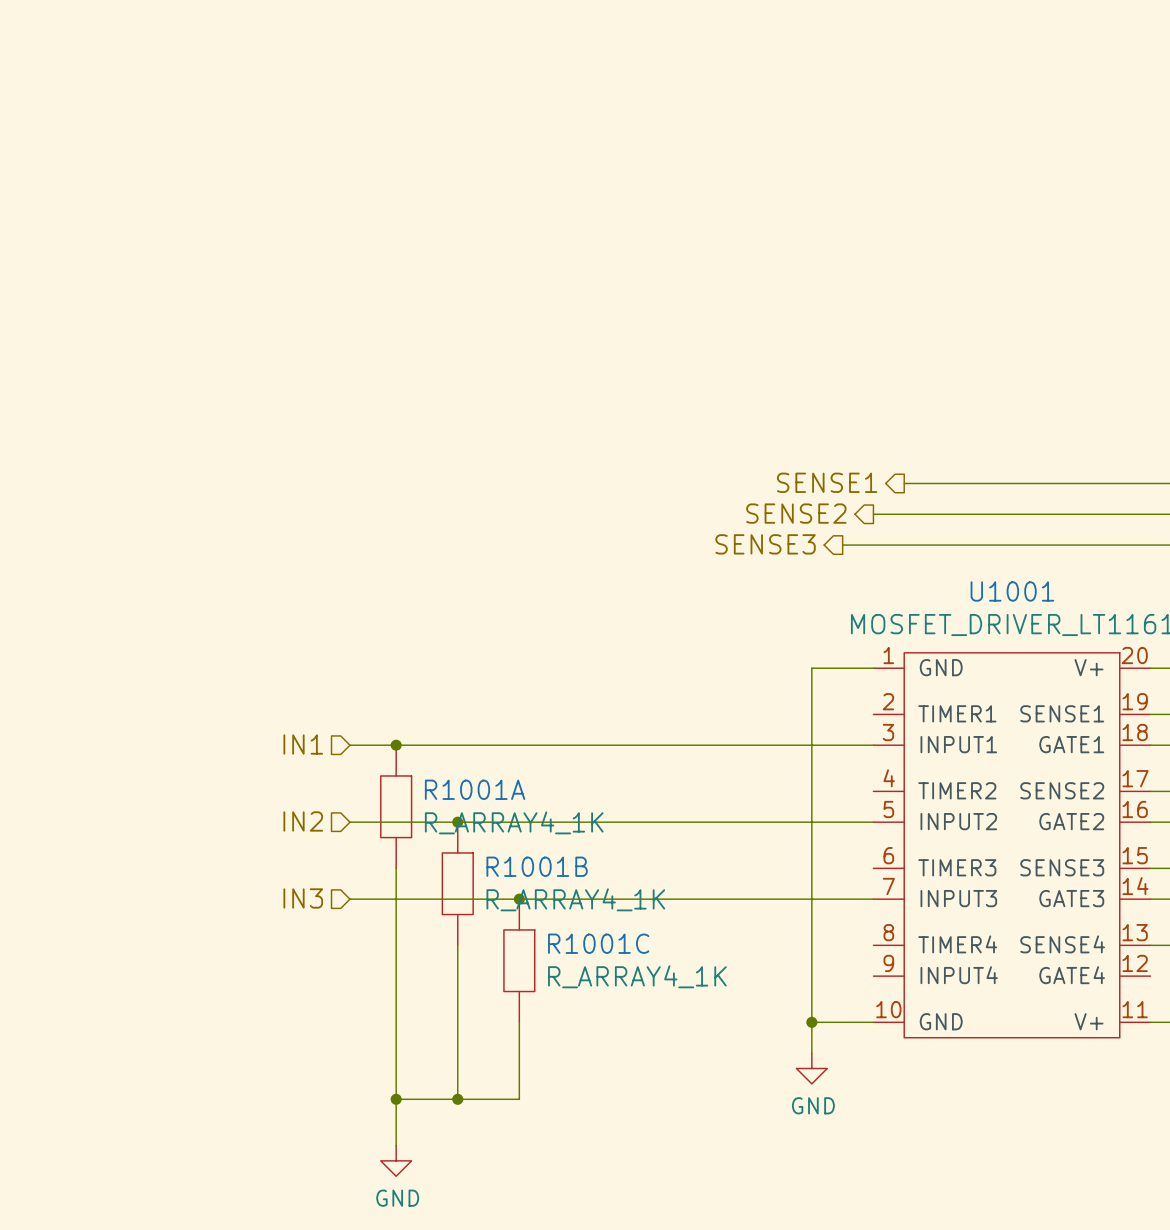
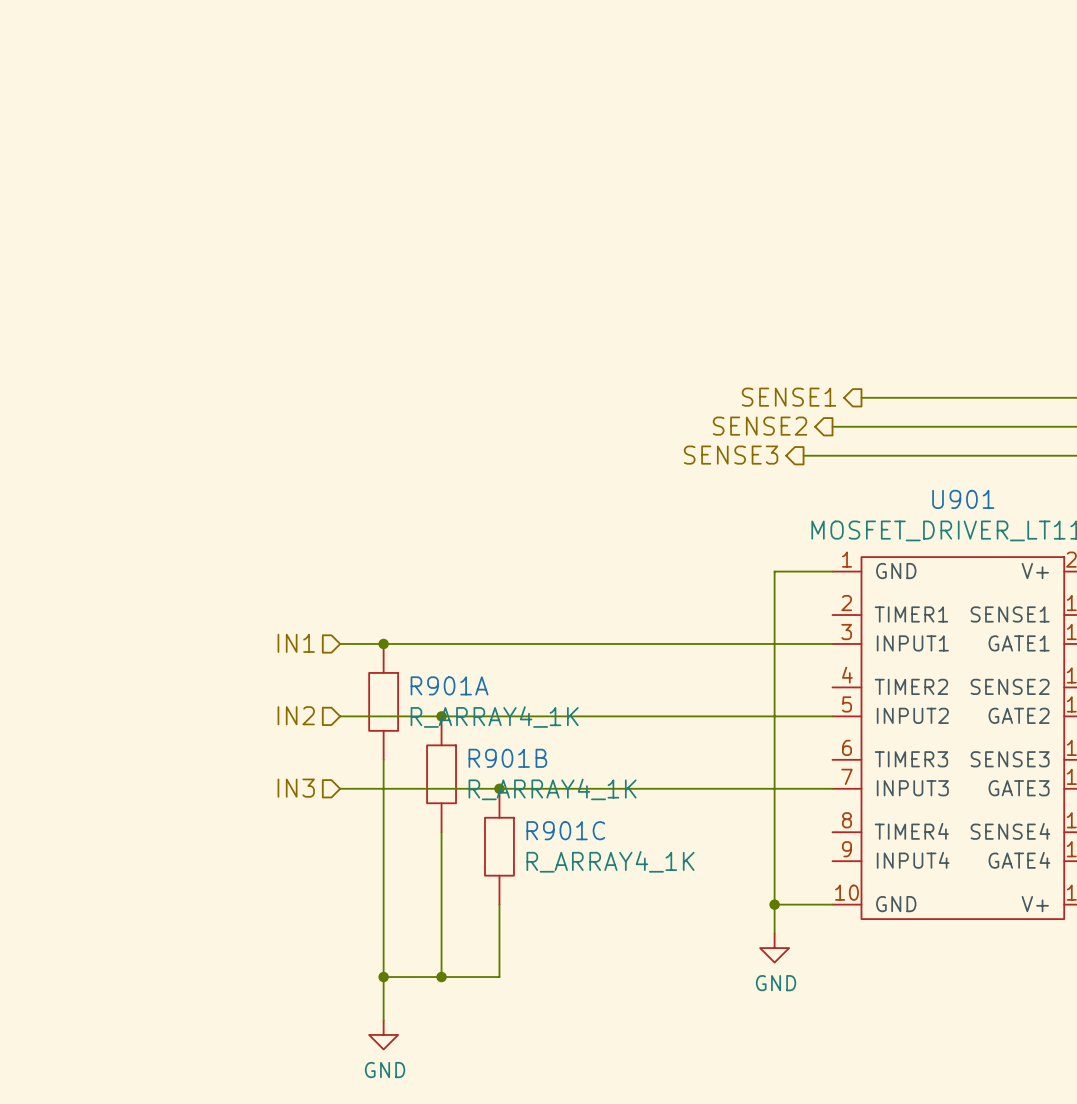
U1001 name: U1001 (1012, 591) -> U901 (963, 499)
R1001A name: R1001A (475, 789) -> R901A (449, 685)
R1001B name: R1001B (537, 866) -> R901B (507, 758)
R1001C name: R1001C (598, 943) -> R901C (565, 830)

